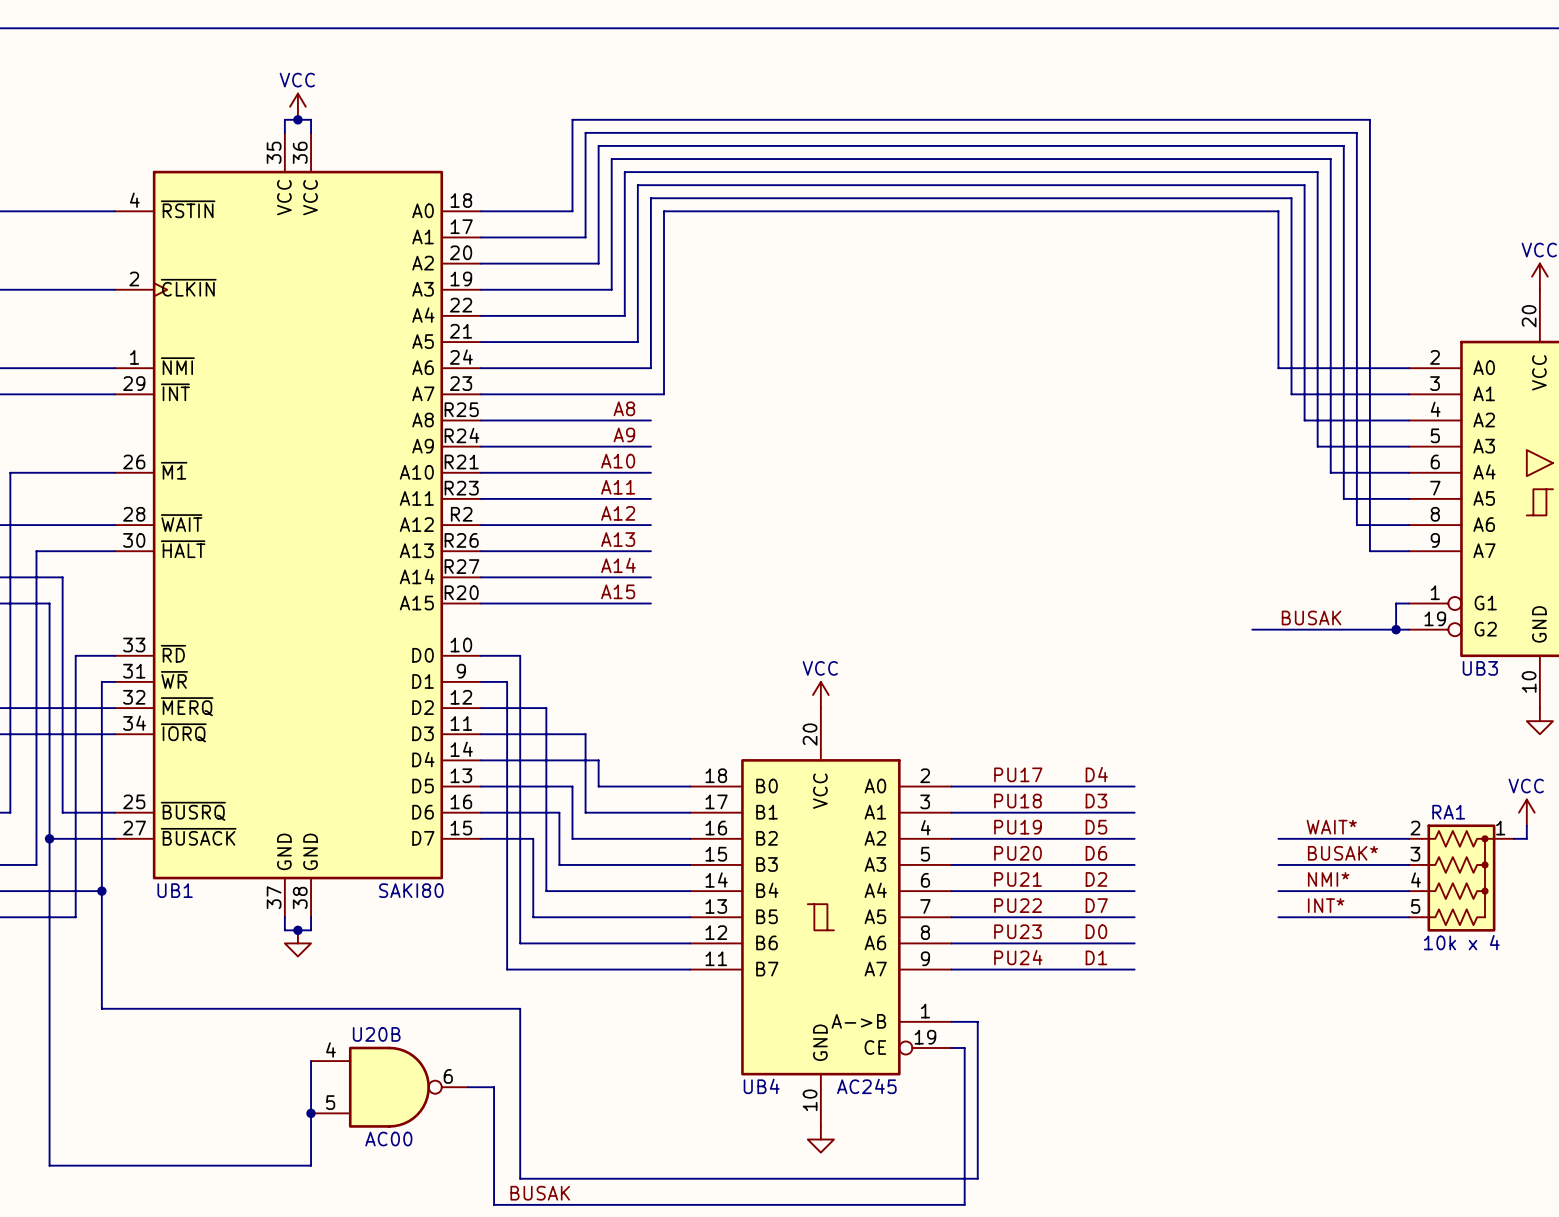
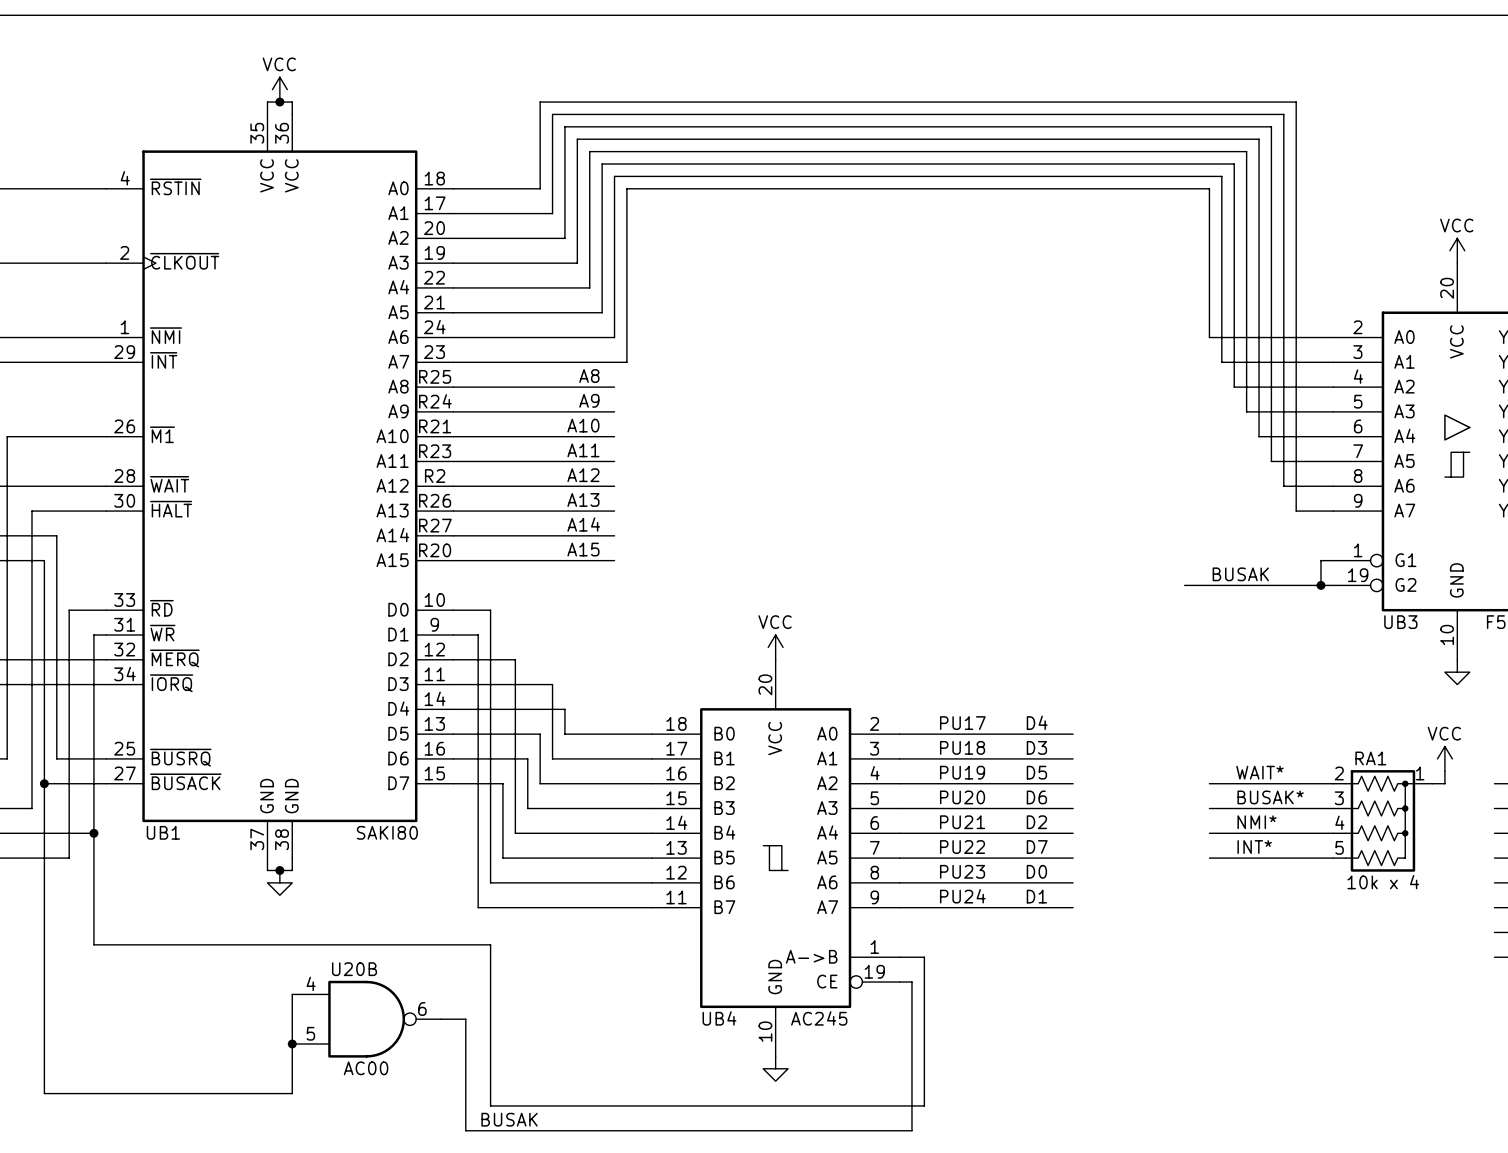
UB1 pin name: ~{CLKIN} (188, 287) -> ~{CLKOUT} (184, 261)

